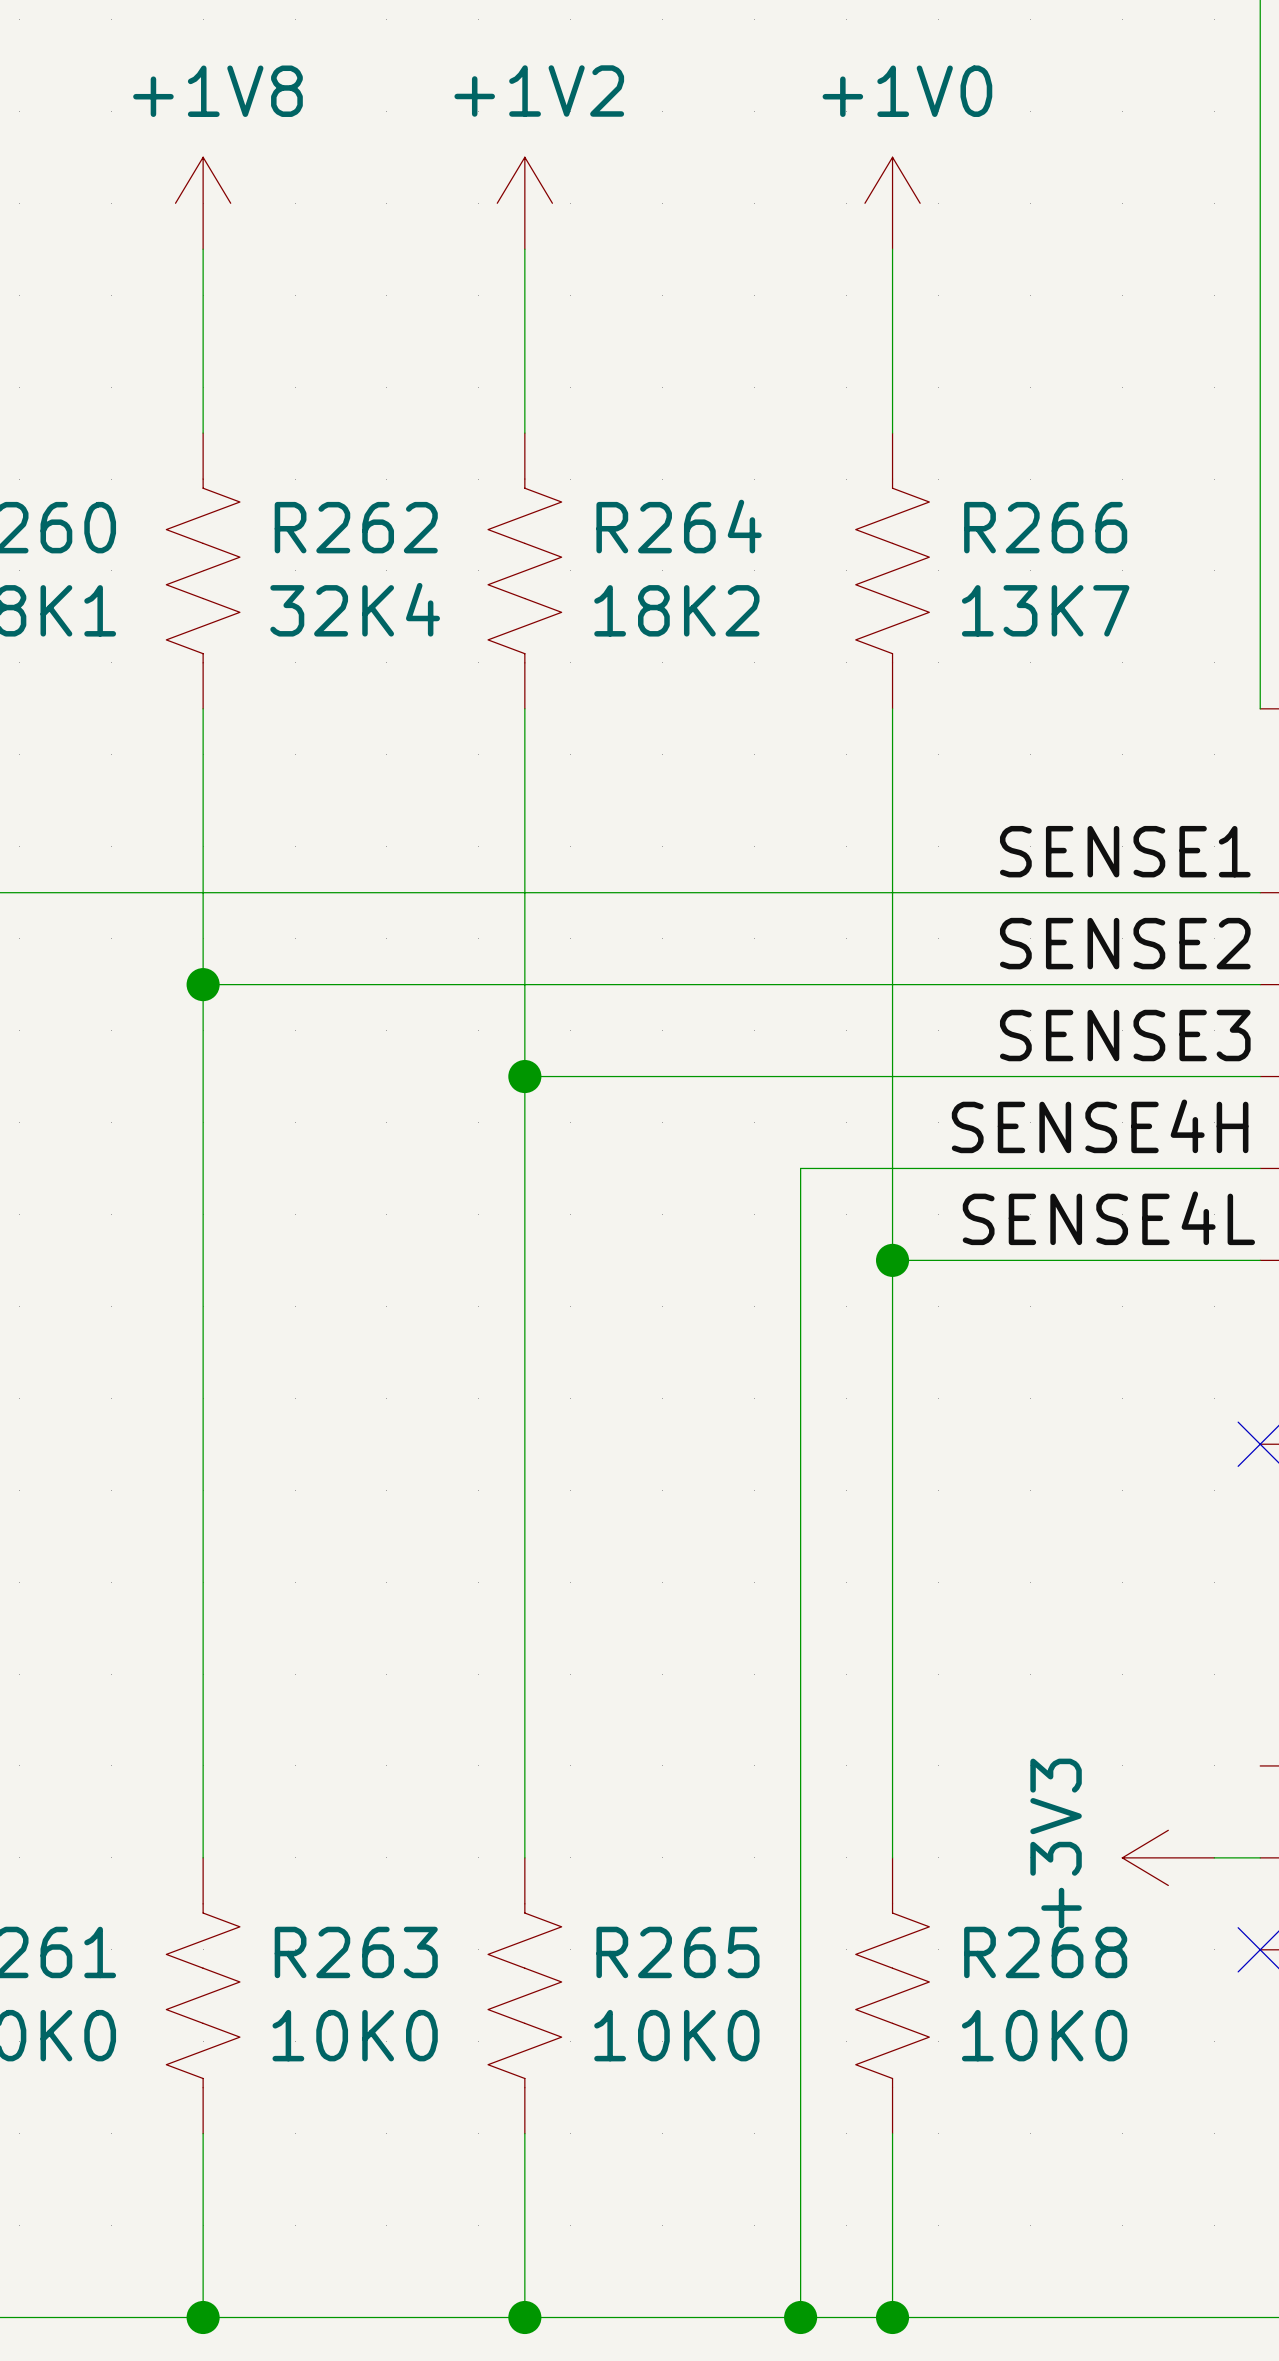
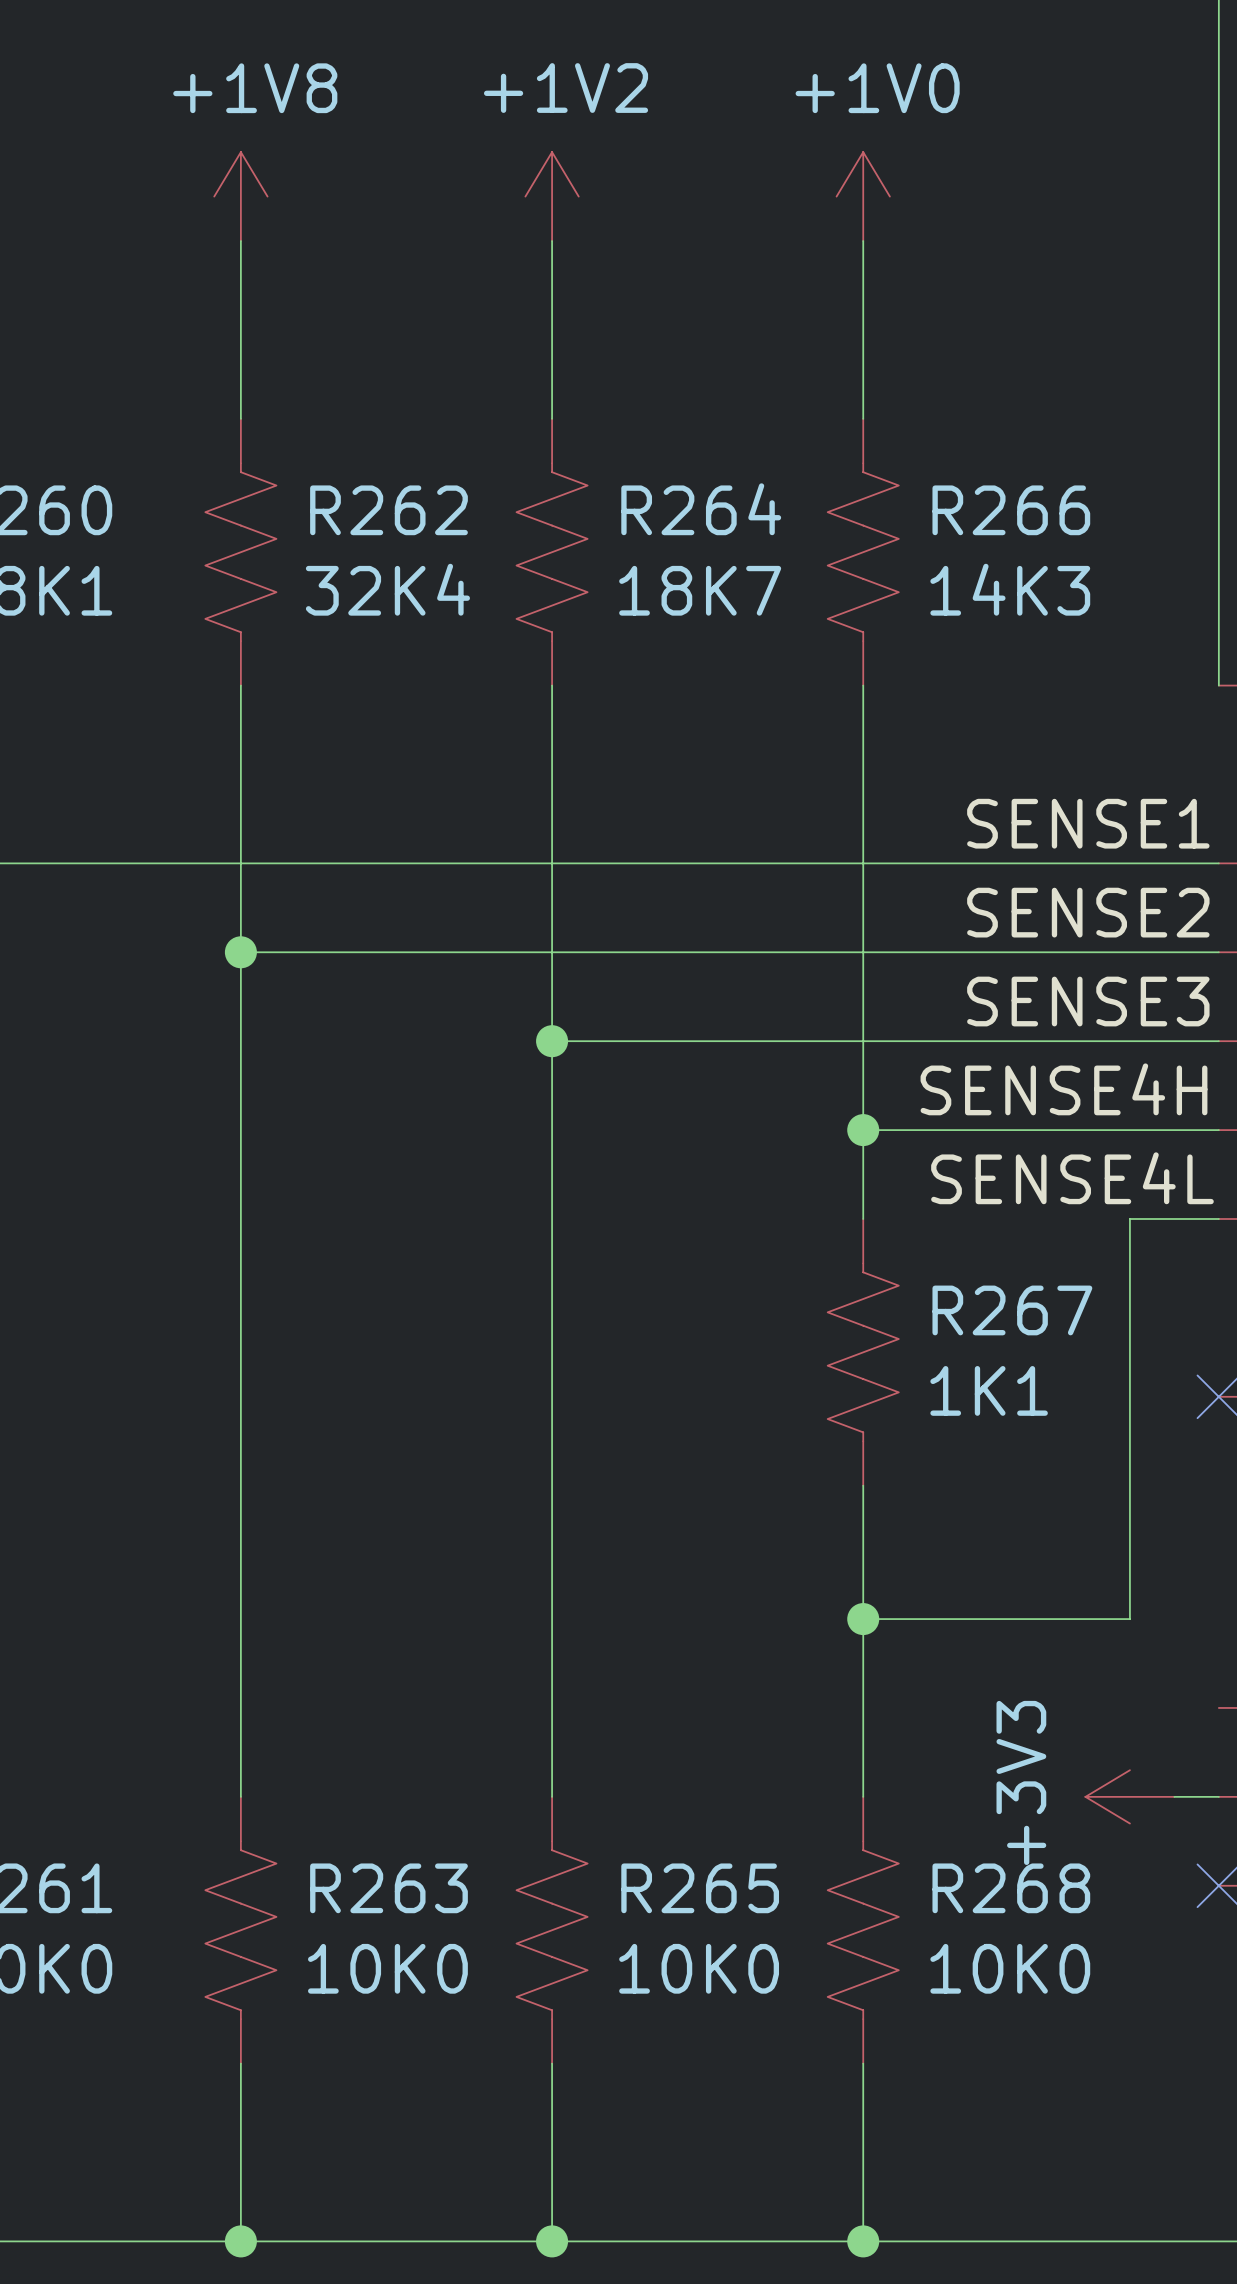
power symbol position: +1V8 (203, 203) -> +1V8 (240, 196)
power symbol position: +1V2 (524, 203) -> +1V2 (552, 196)
wire: (203, 249) (203, 433) -> (240, 241) (240, 418)
wire: (524, 249) (524, 433) -> (552, 241) (552, 418)
R262 position: (203, 570) -> (240, 552)
R264 position: (524, 570) -> (552, 552)
R264 value: 18K2 (676, 610) -> 18K7 (700, 590)
R266 value: 13K7 (1045, 610) -> 14K3 (1010, 589)
wire: (203, 708) (203, 1857) -> (240, 685) (240, 1796)
wire: (524, 708) (524, 1857) -> (552, 685) (552, 1796)
wire: (203, 984) (249, 984) -> none
junction position: (203, 984) -> (240, 952)
wire: (524, 1076) (570, 1076) -> none
junction position: (524, 1076) -> (552, 1041)
wire: (892, 1168) (800, 1168) (800, 2317) -> none
junction position: (892, 1260) -> (863, 1130)
wire: (1168, 1260) (892, 1260) (892, 1536) -> (1129, 1218) (1129, 1619) (863, 1619)
R267: none -> 1K1 (863, 1352)
junction: none -> (863, 1619)
R263 position: (203, 1995) -> (240, 1930)
R265 position: (524, 1995) -> (552, 1930)
wire: (203, 2133) (203, 2317) -> (240, 2063) (240, 2241)
wire: (524, 2133) (524, 2317) -> (552, 2063) (552, 2241)
junction position: (203, 2317) -> (240, 2241)
junction position: (524, 2317) -> (552, 2241)
junction: (800, 2317) -> none

